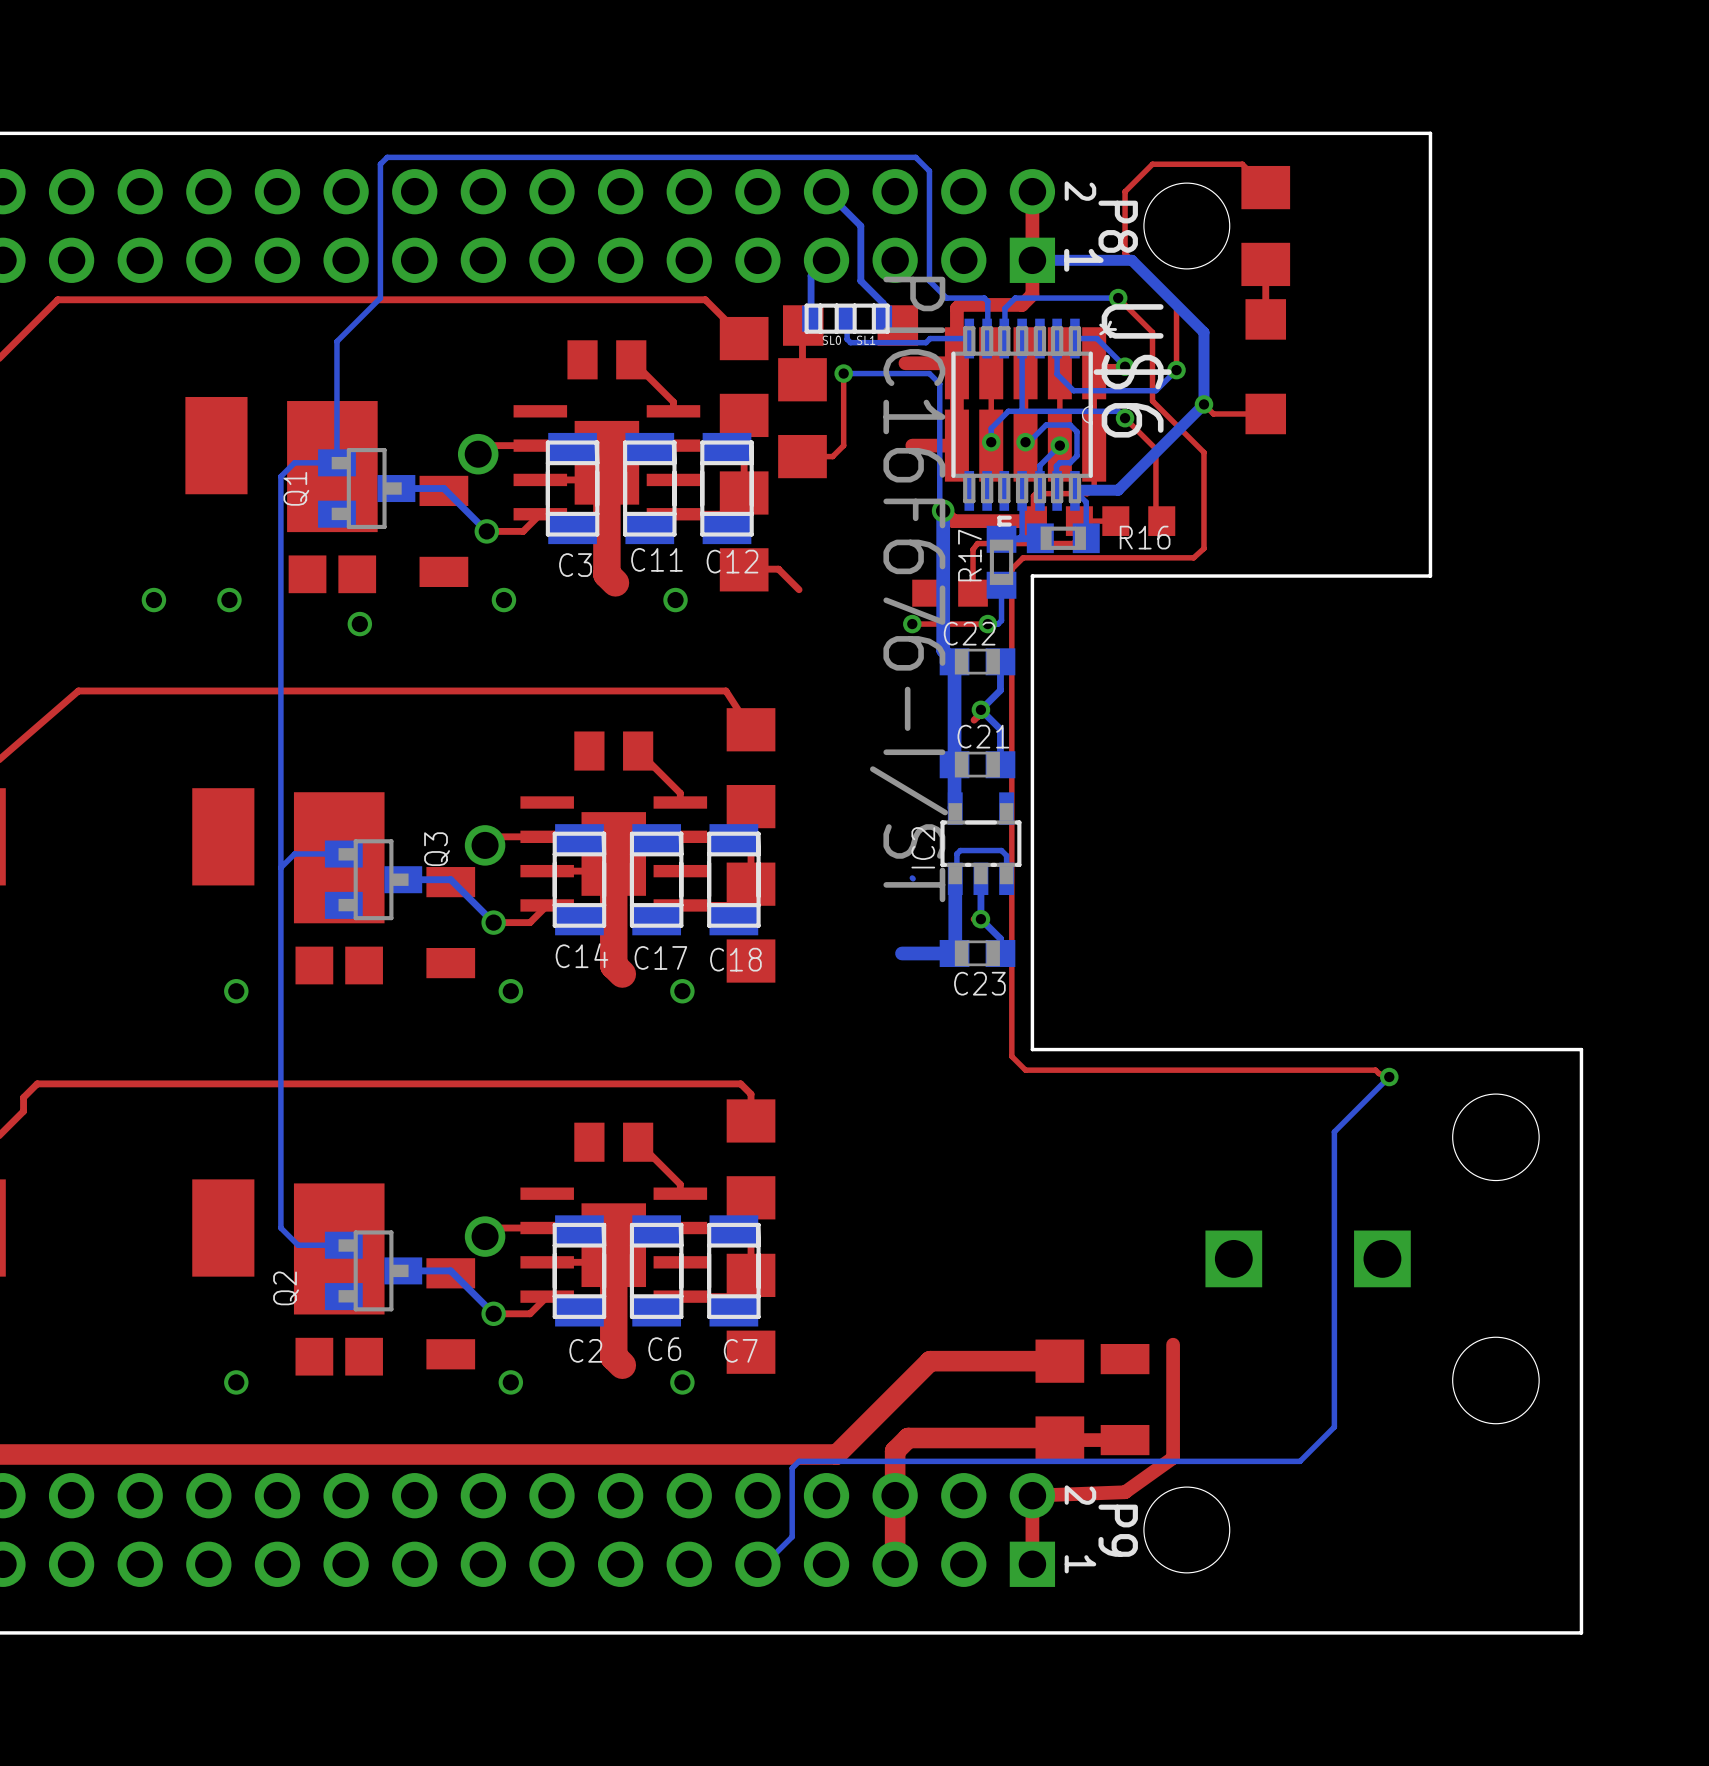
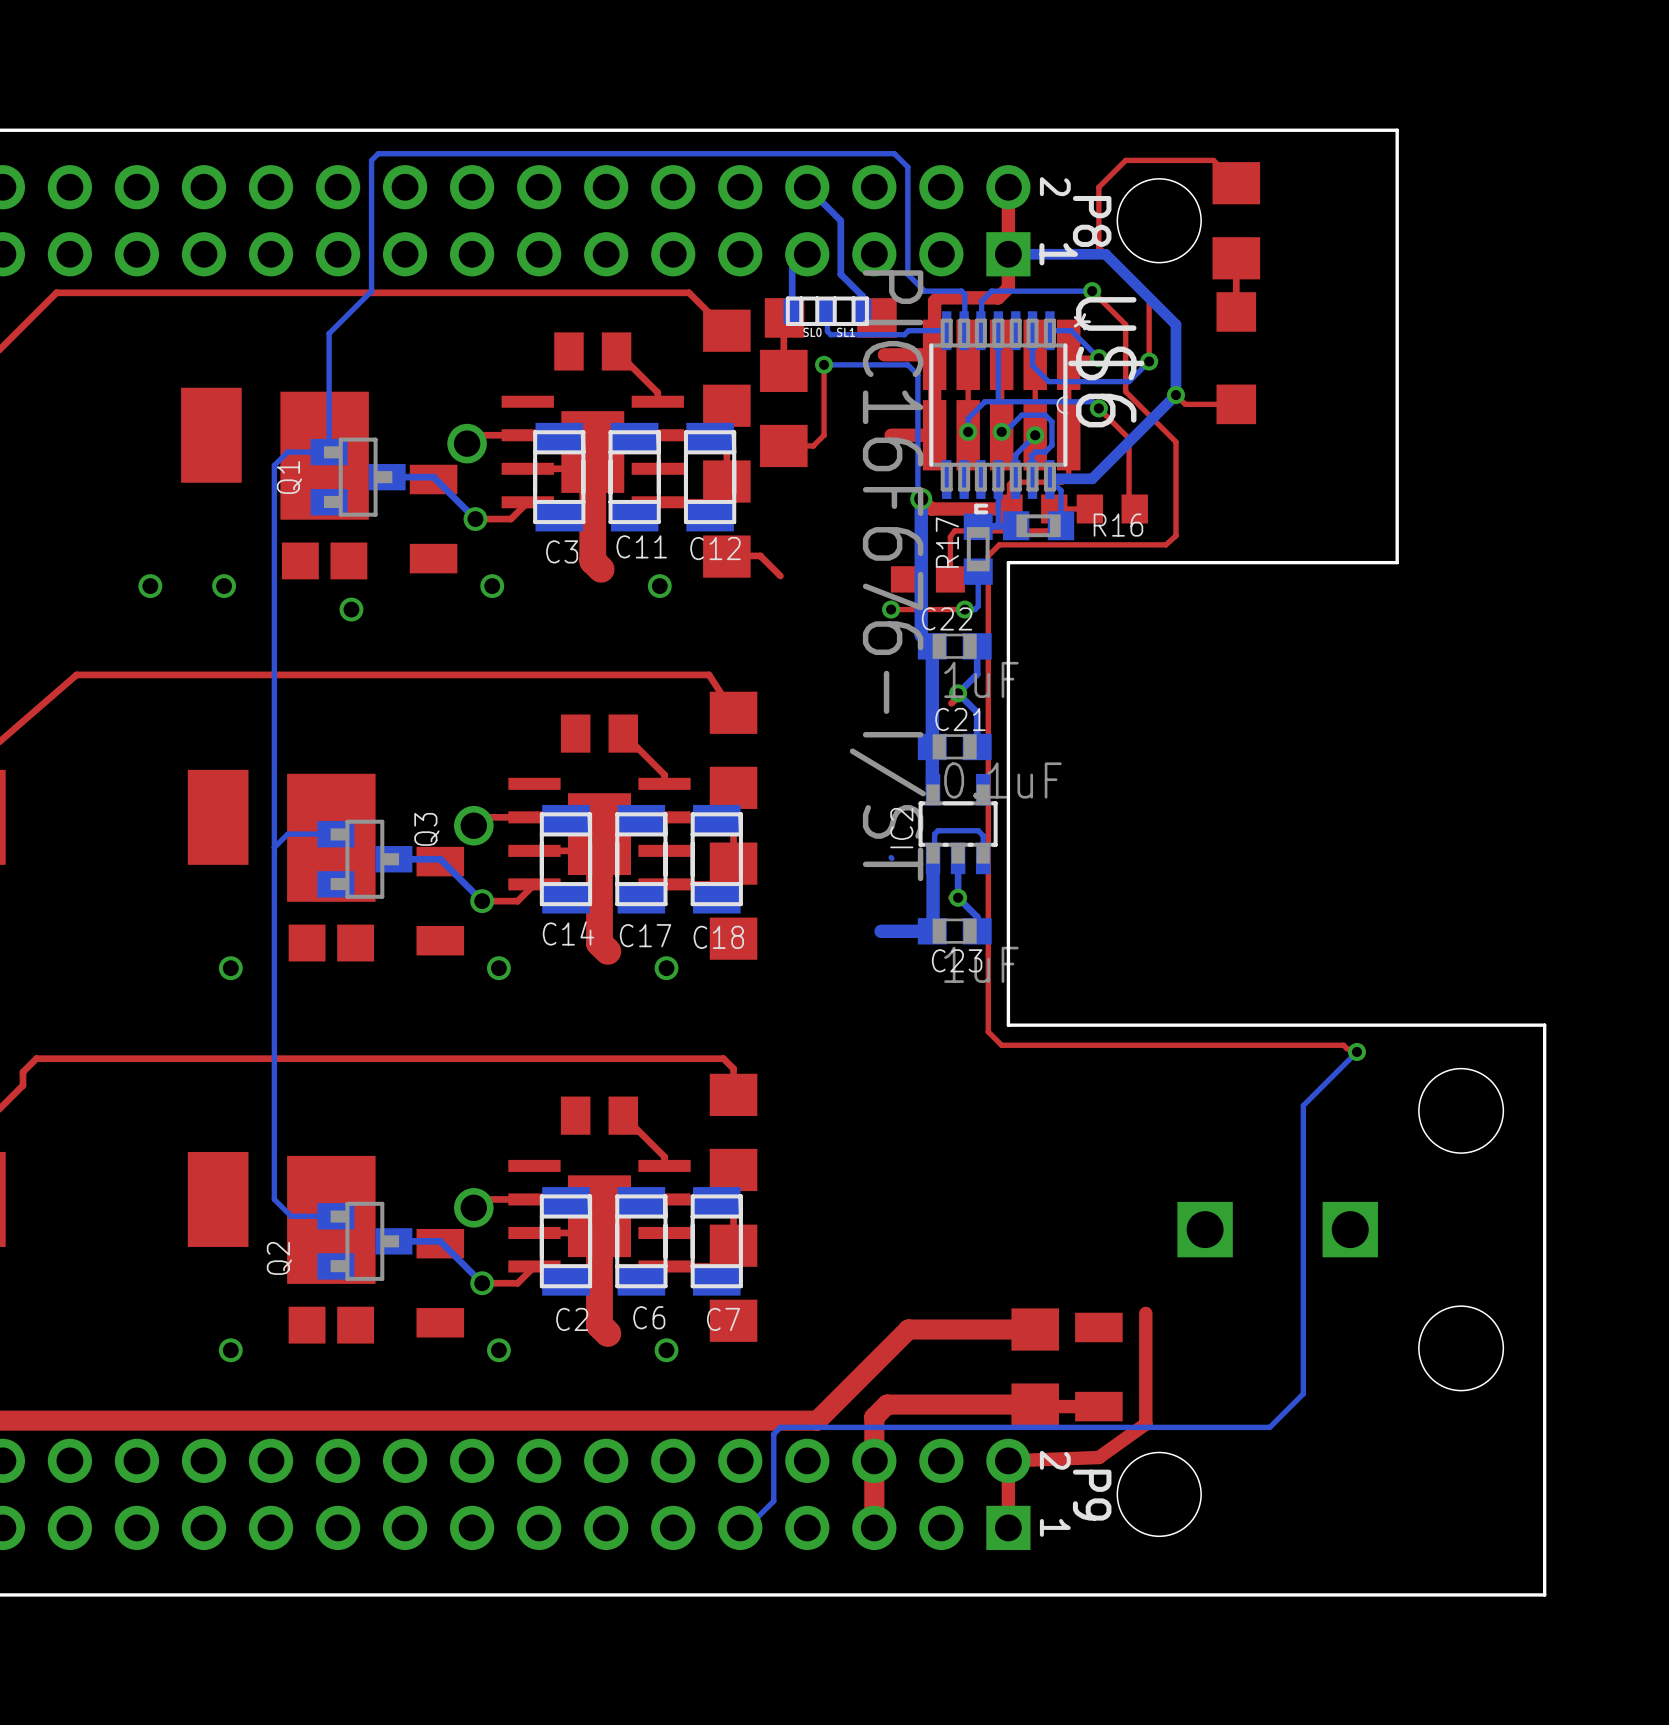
C22 value: none -> 1uF (981, 679)
C21 value: none -> 0.1uF (1002, 780)
C23 value: none -> 1uF (981, 964)

